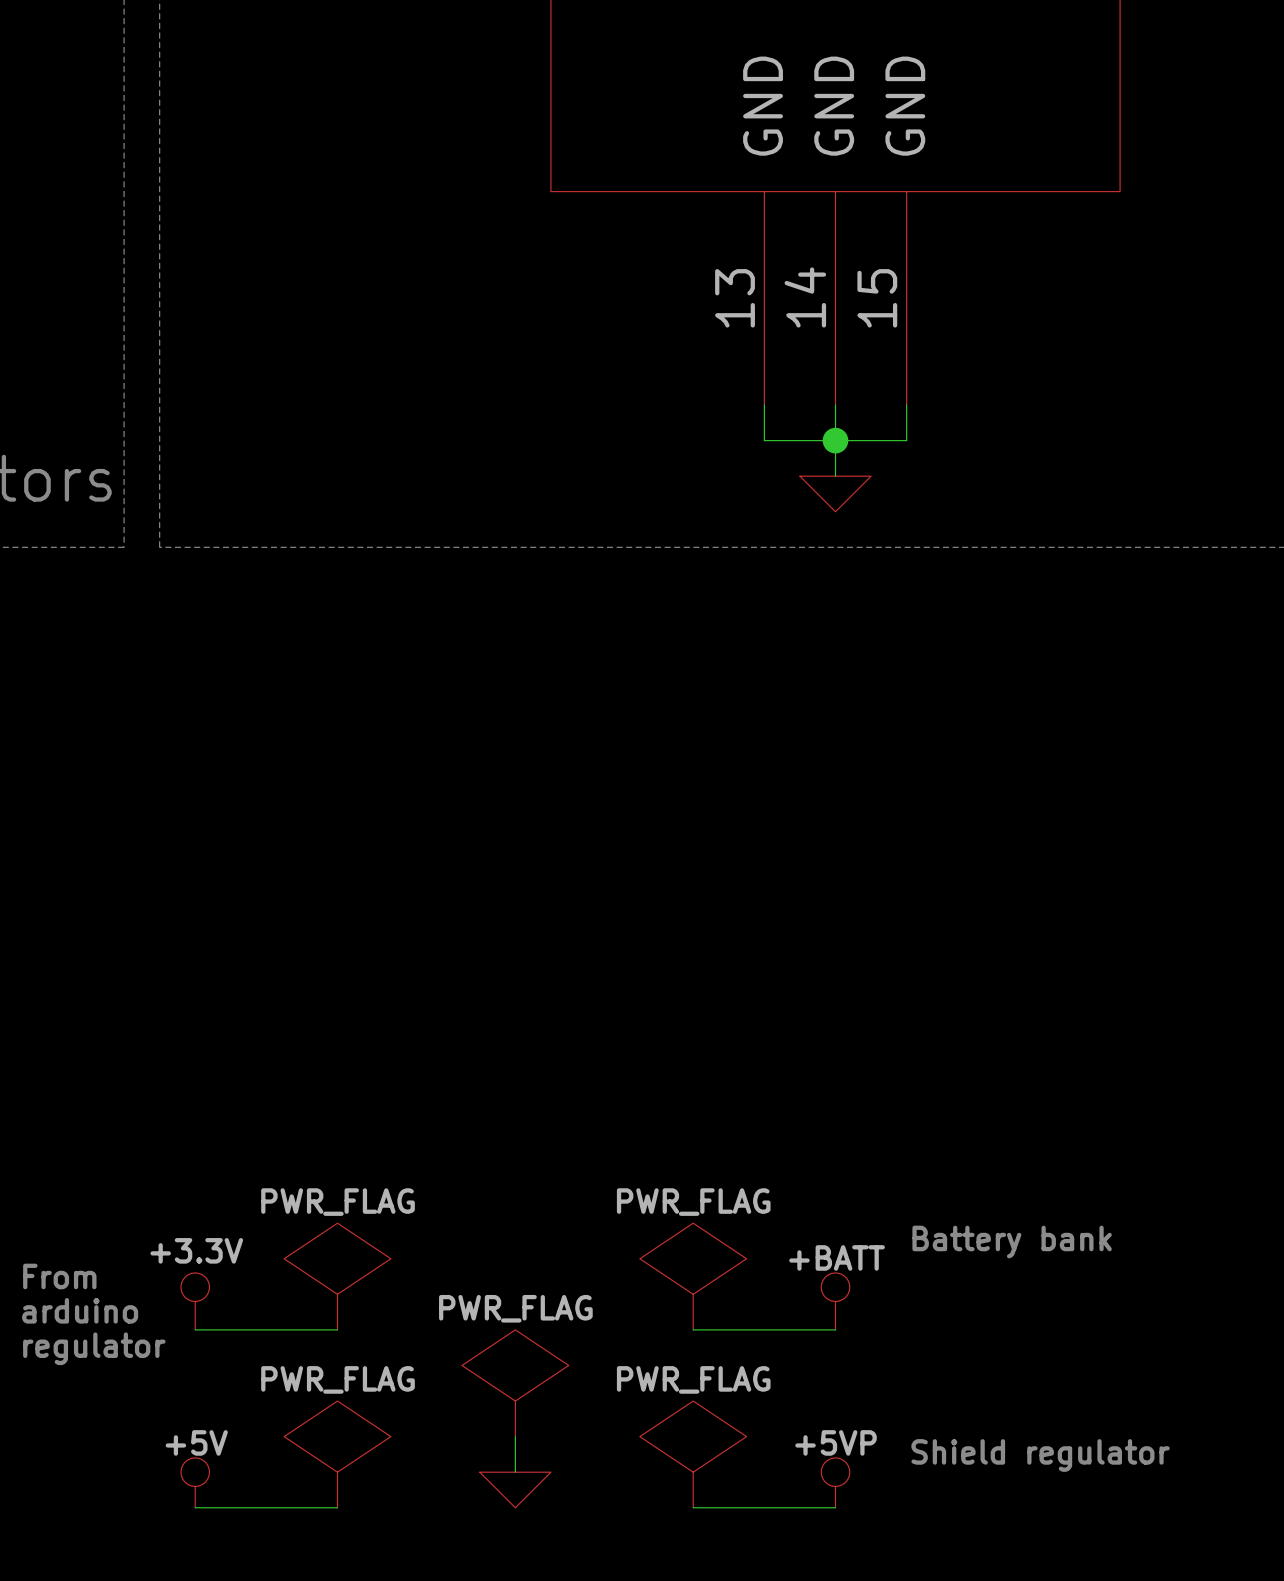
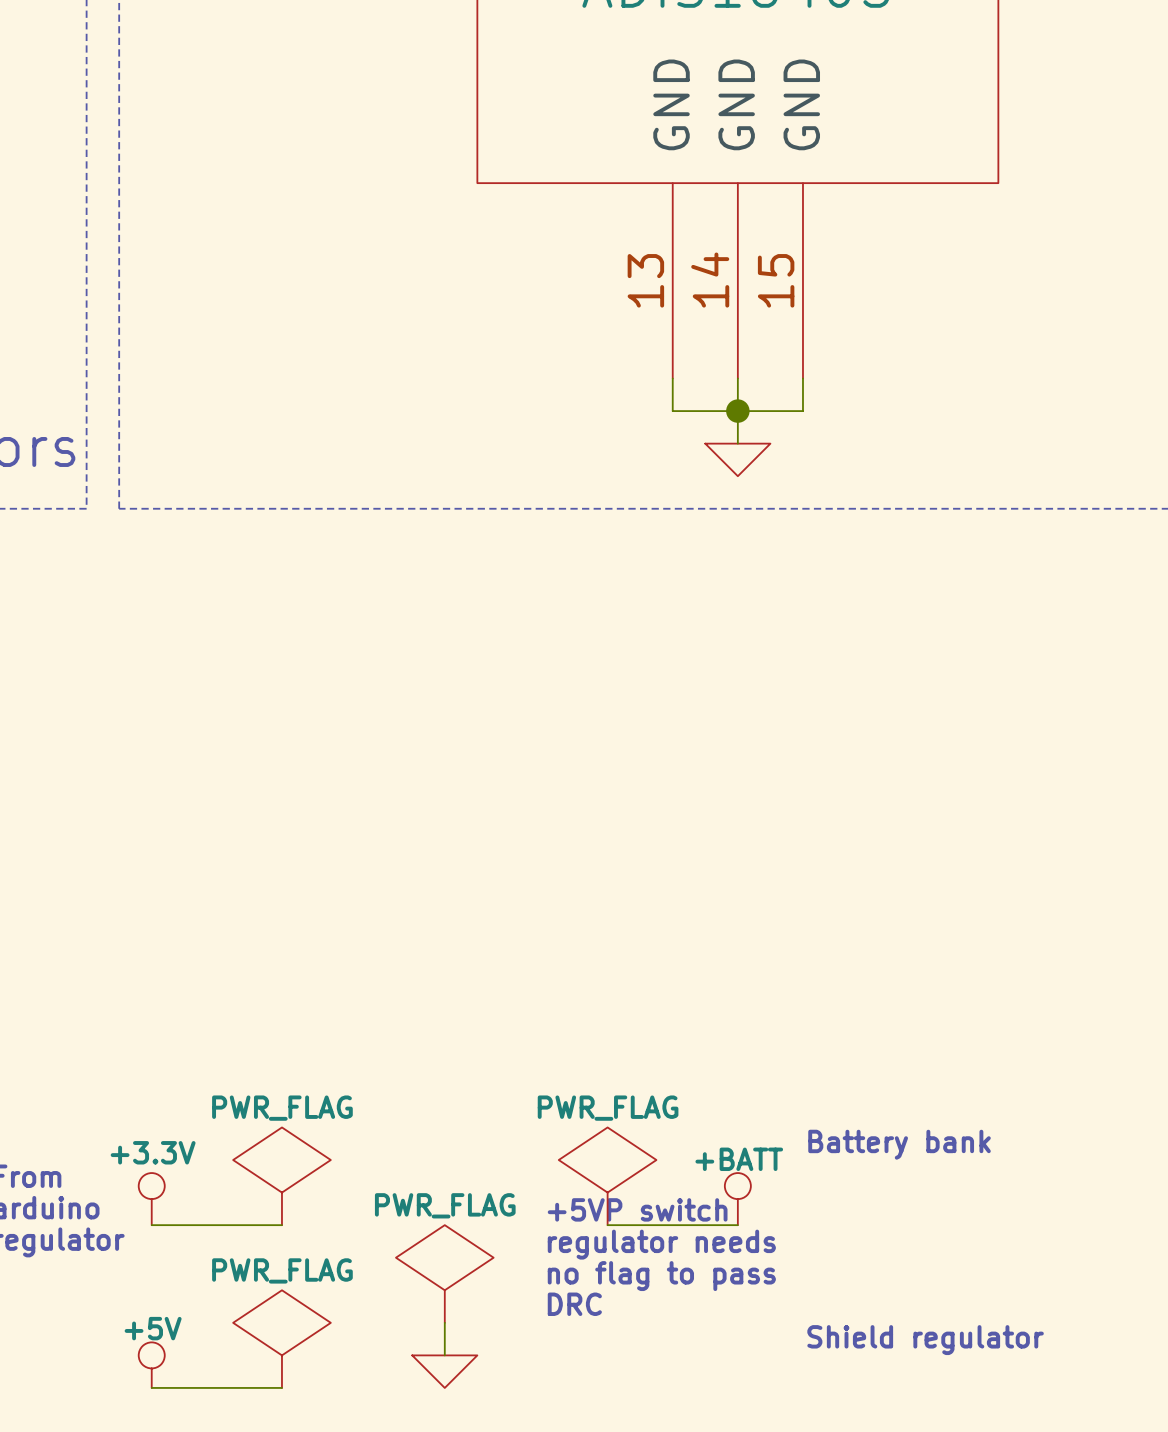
text: none -> +5VP switch (637, 1209)
text: none -> regulator needs (661, 1244)
text: none -> no flag to pass (661, 1276)
text: none -> DRC (574, 1304)
power symbol: PWR_FLAG (693, 1454) -> none
power symbol: +5VP (835, 1482) -> none
wire: (693, 1507) (835, 1507) -> none

